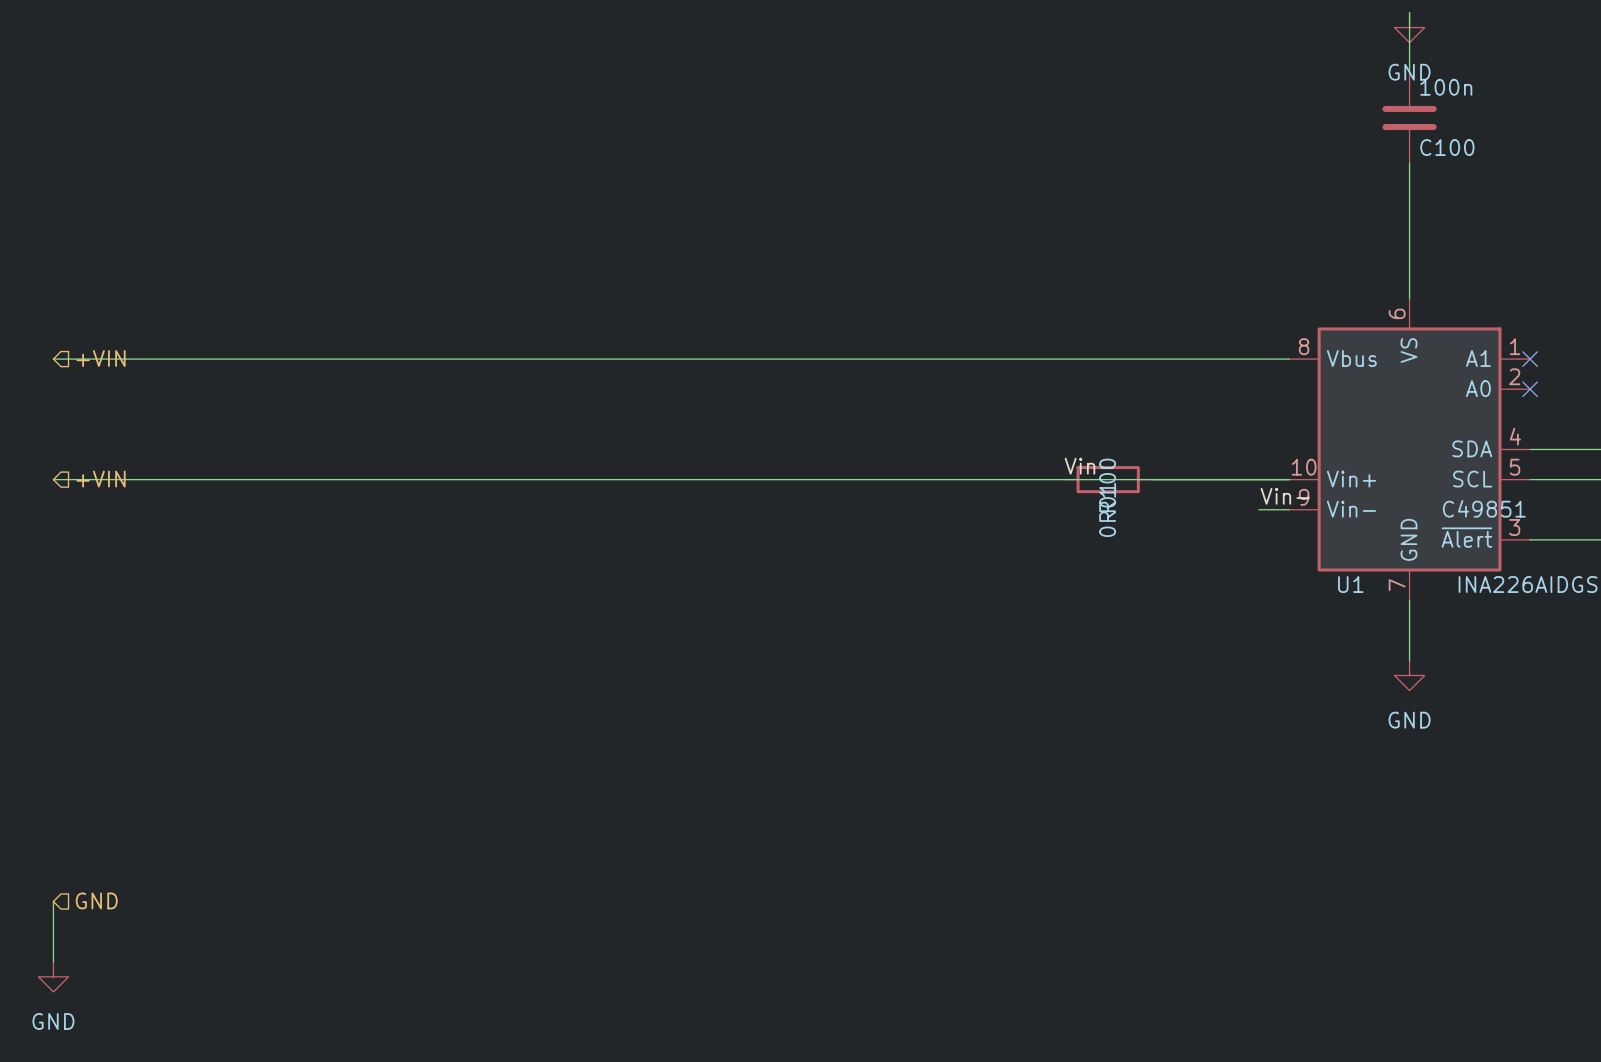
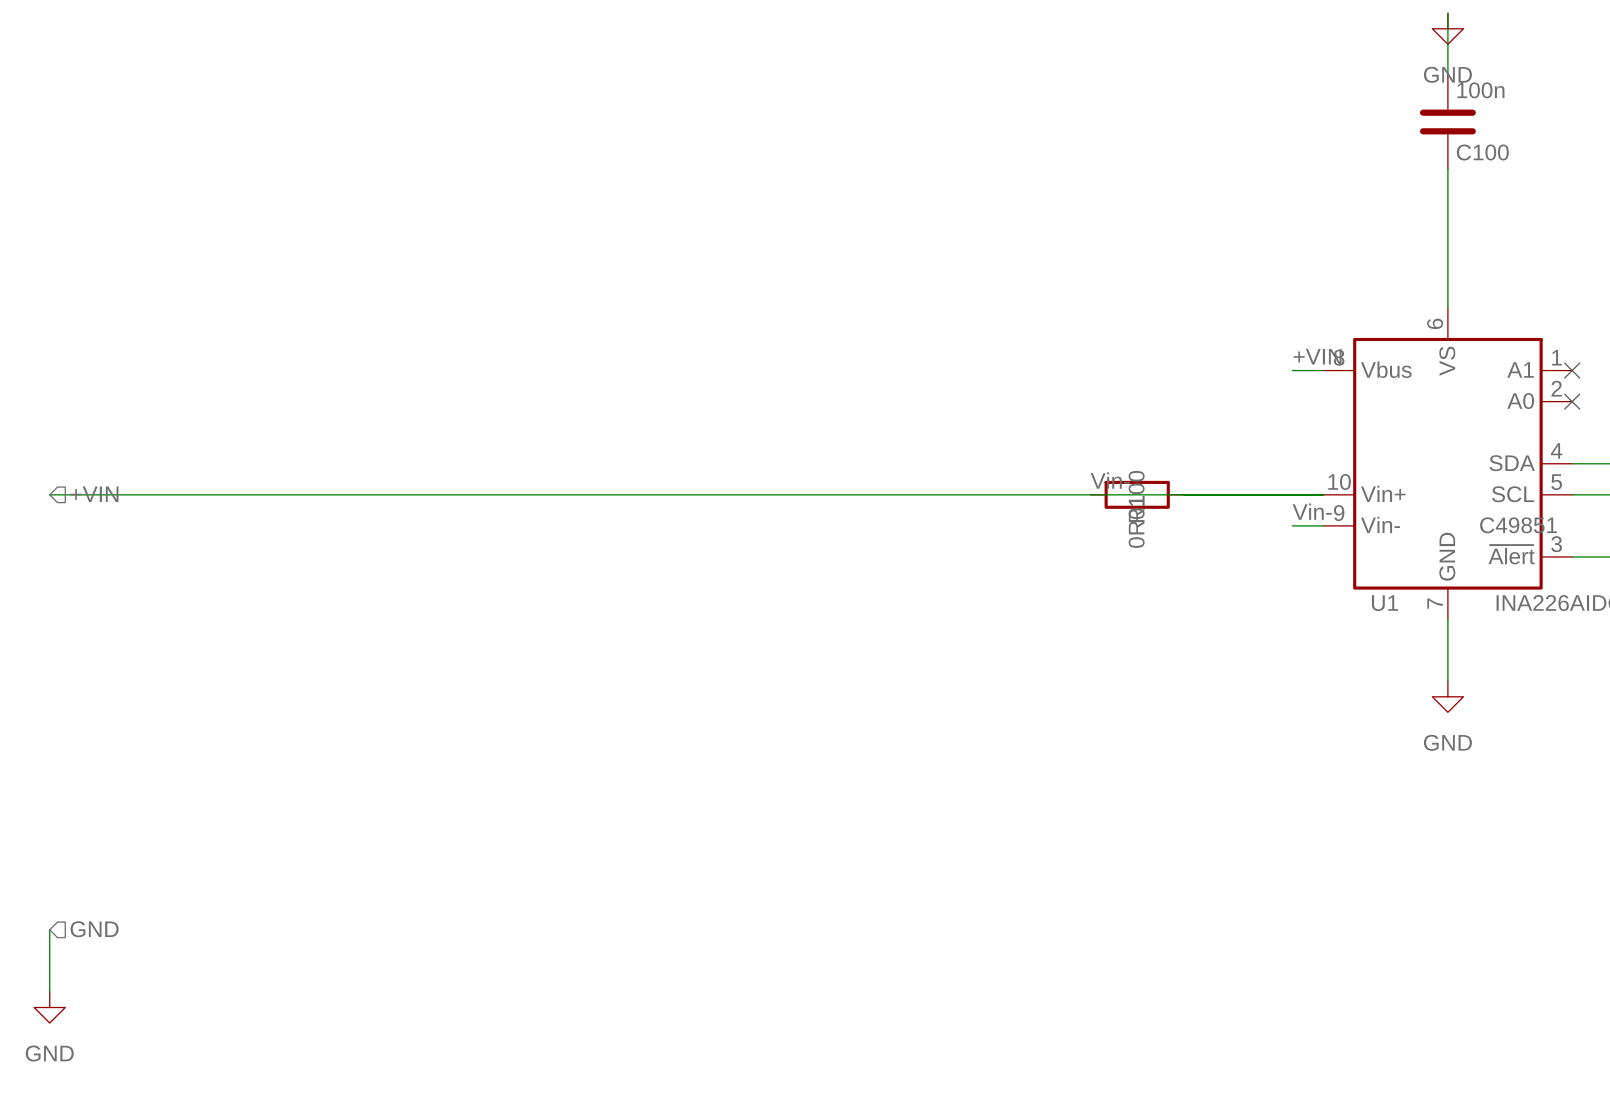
label: none -> +VIN (1317, 356)
hierarchical label: +VIN (101, 358) -> none
wire: (53, 359) (1258, 359) -> none

